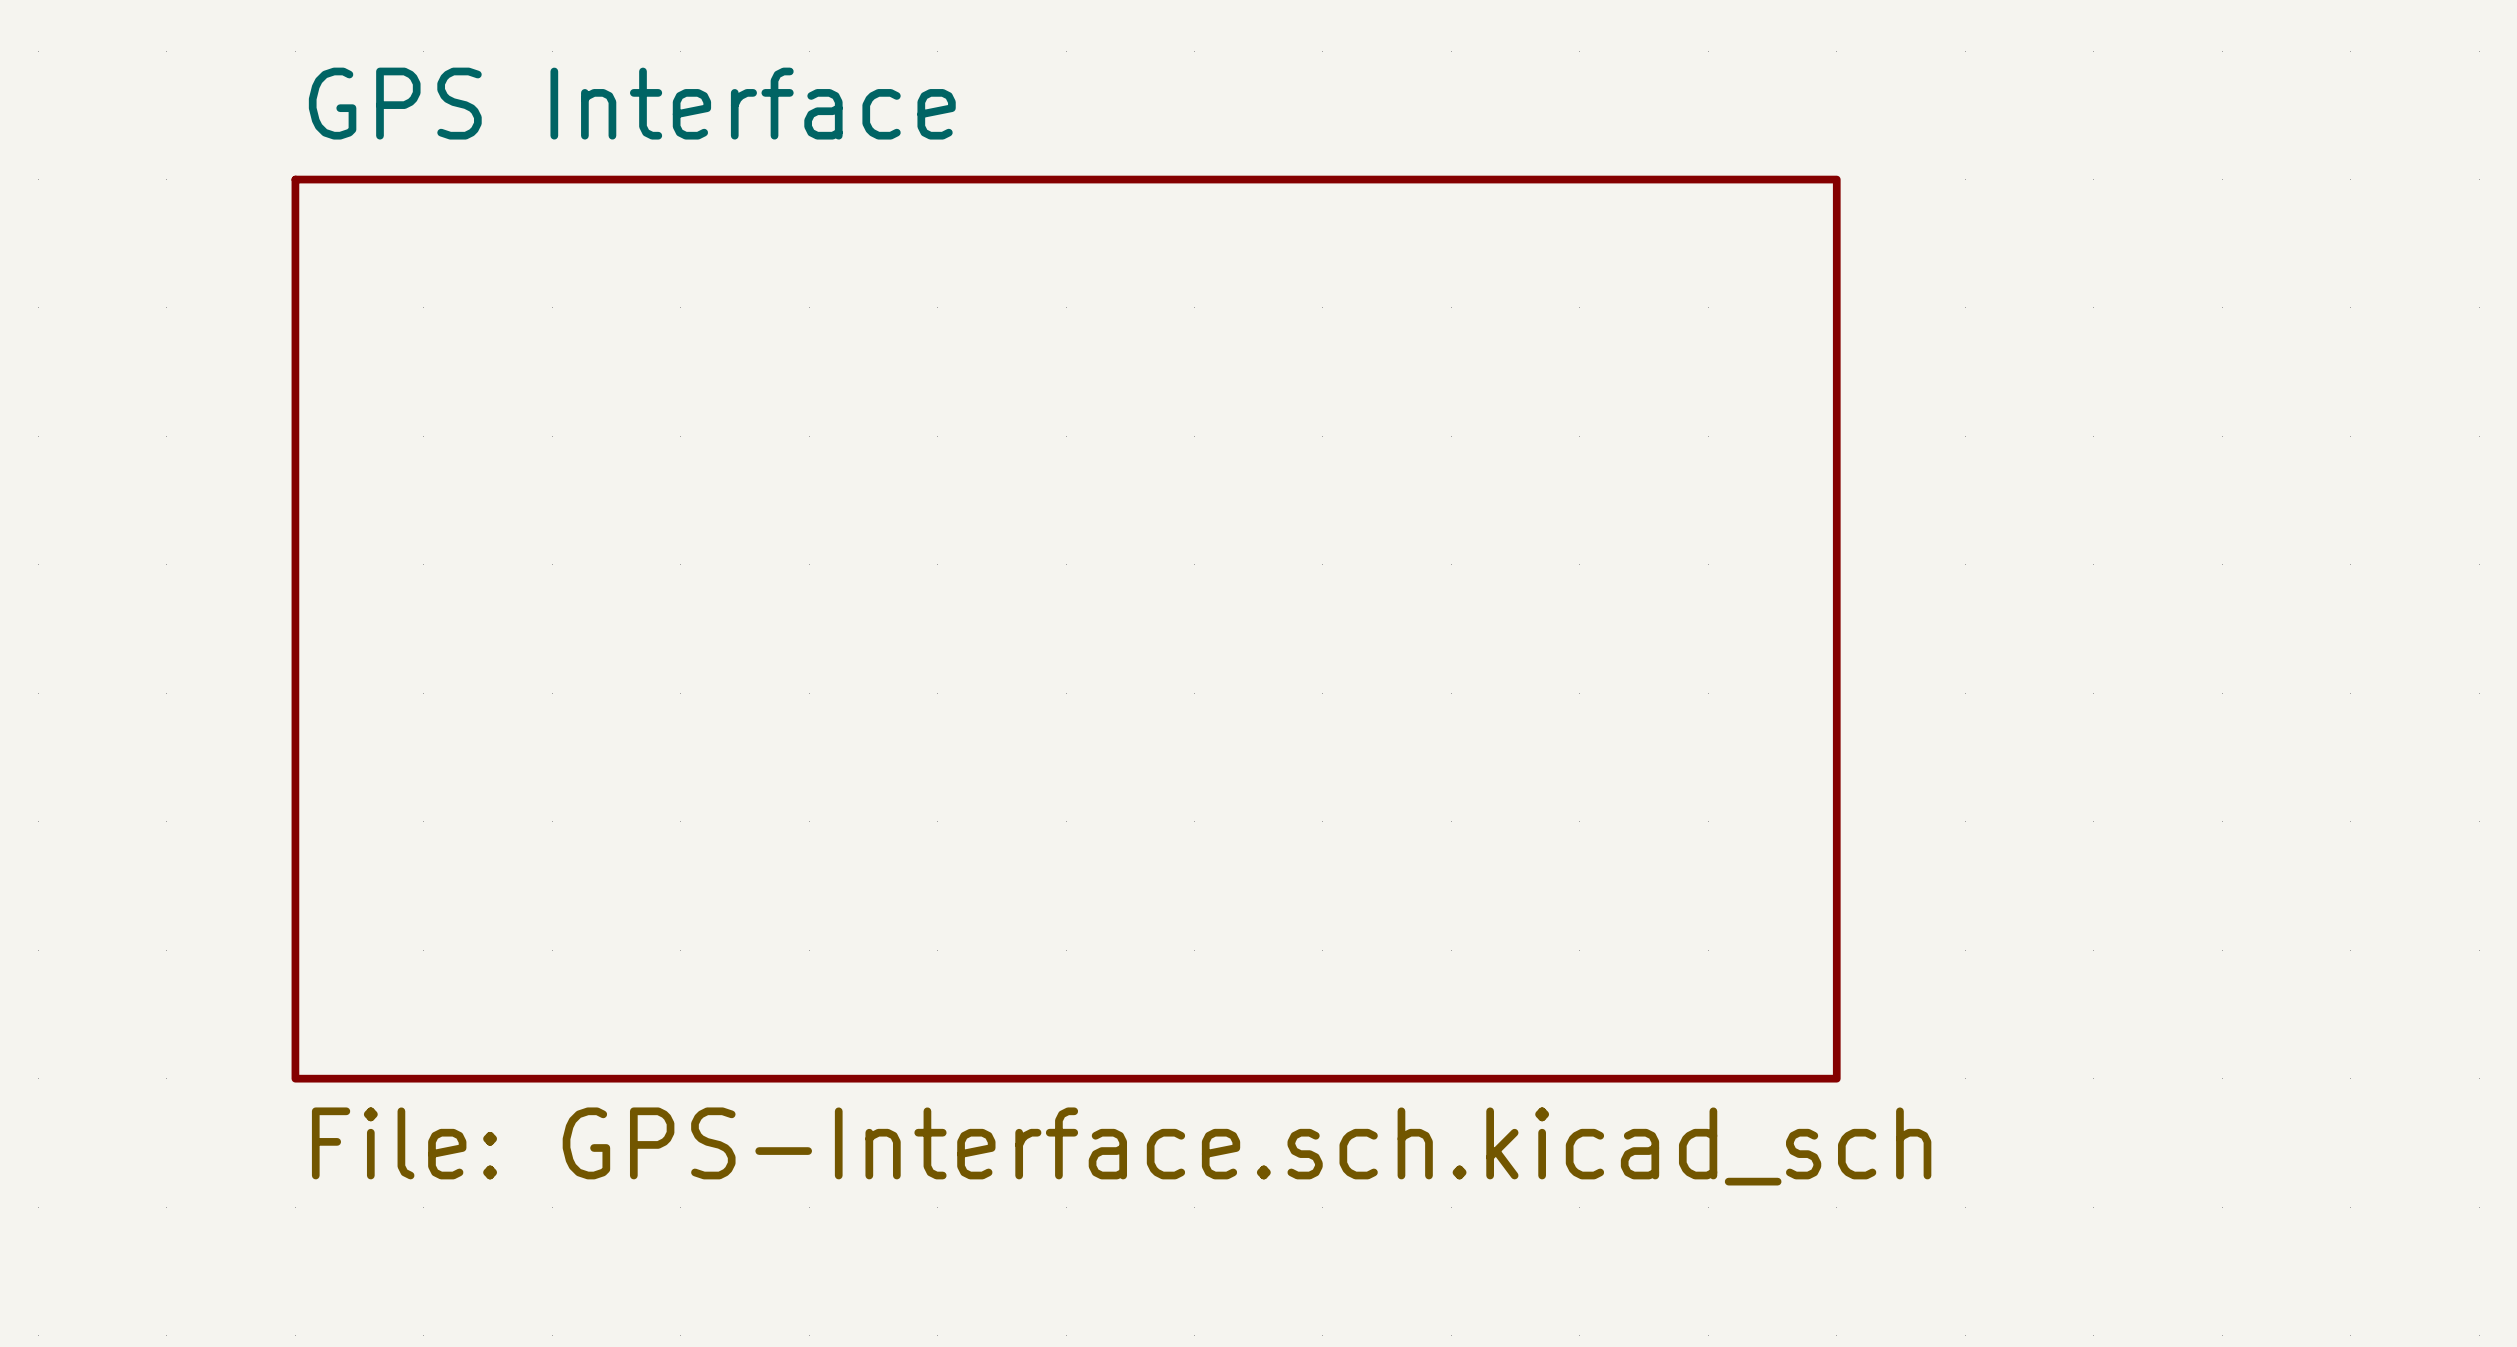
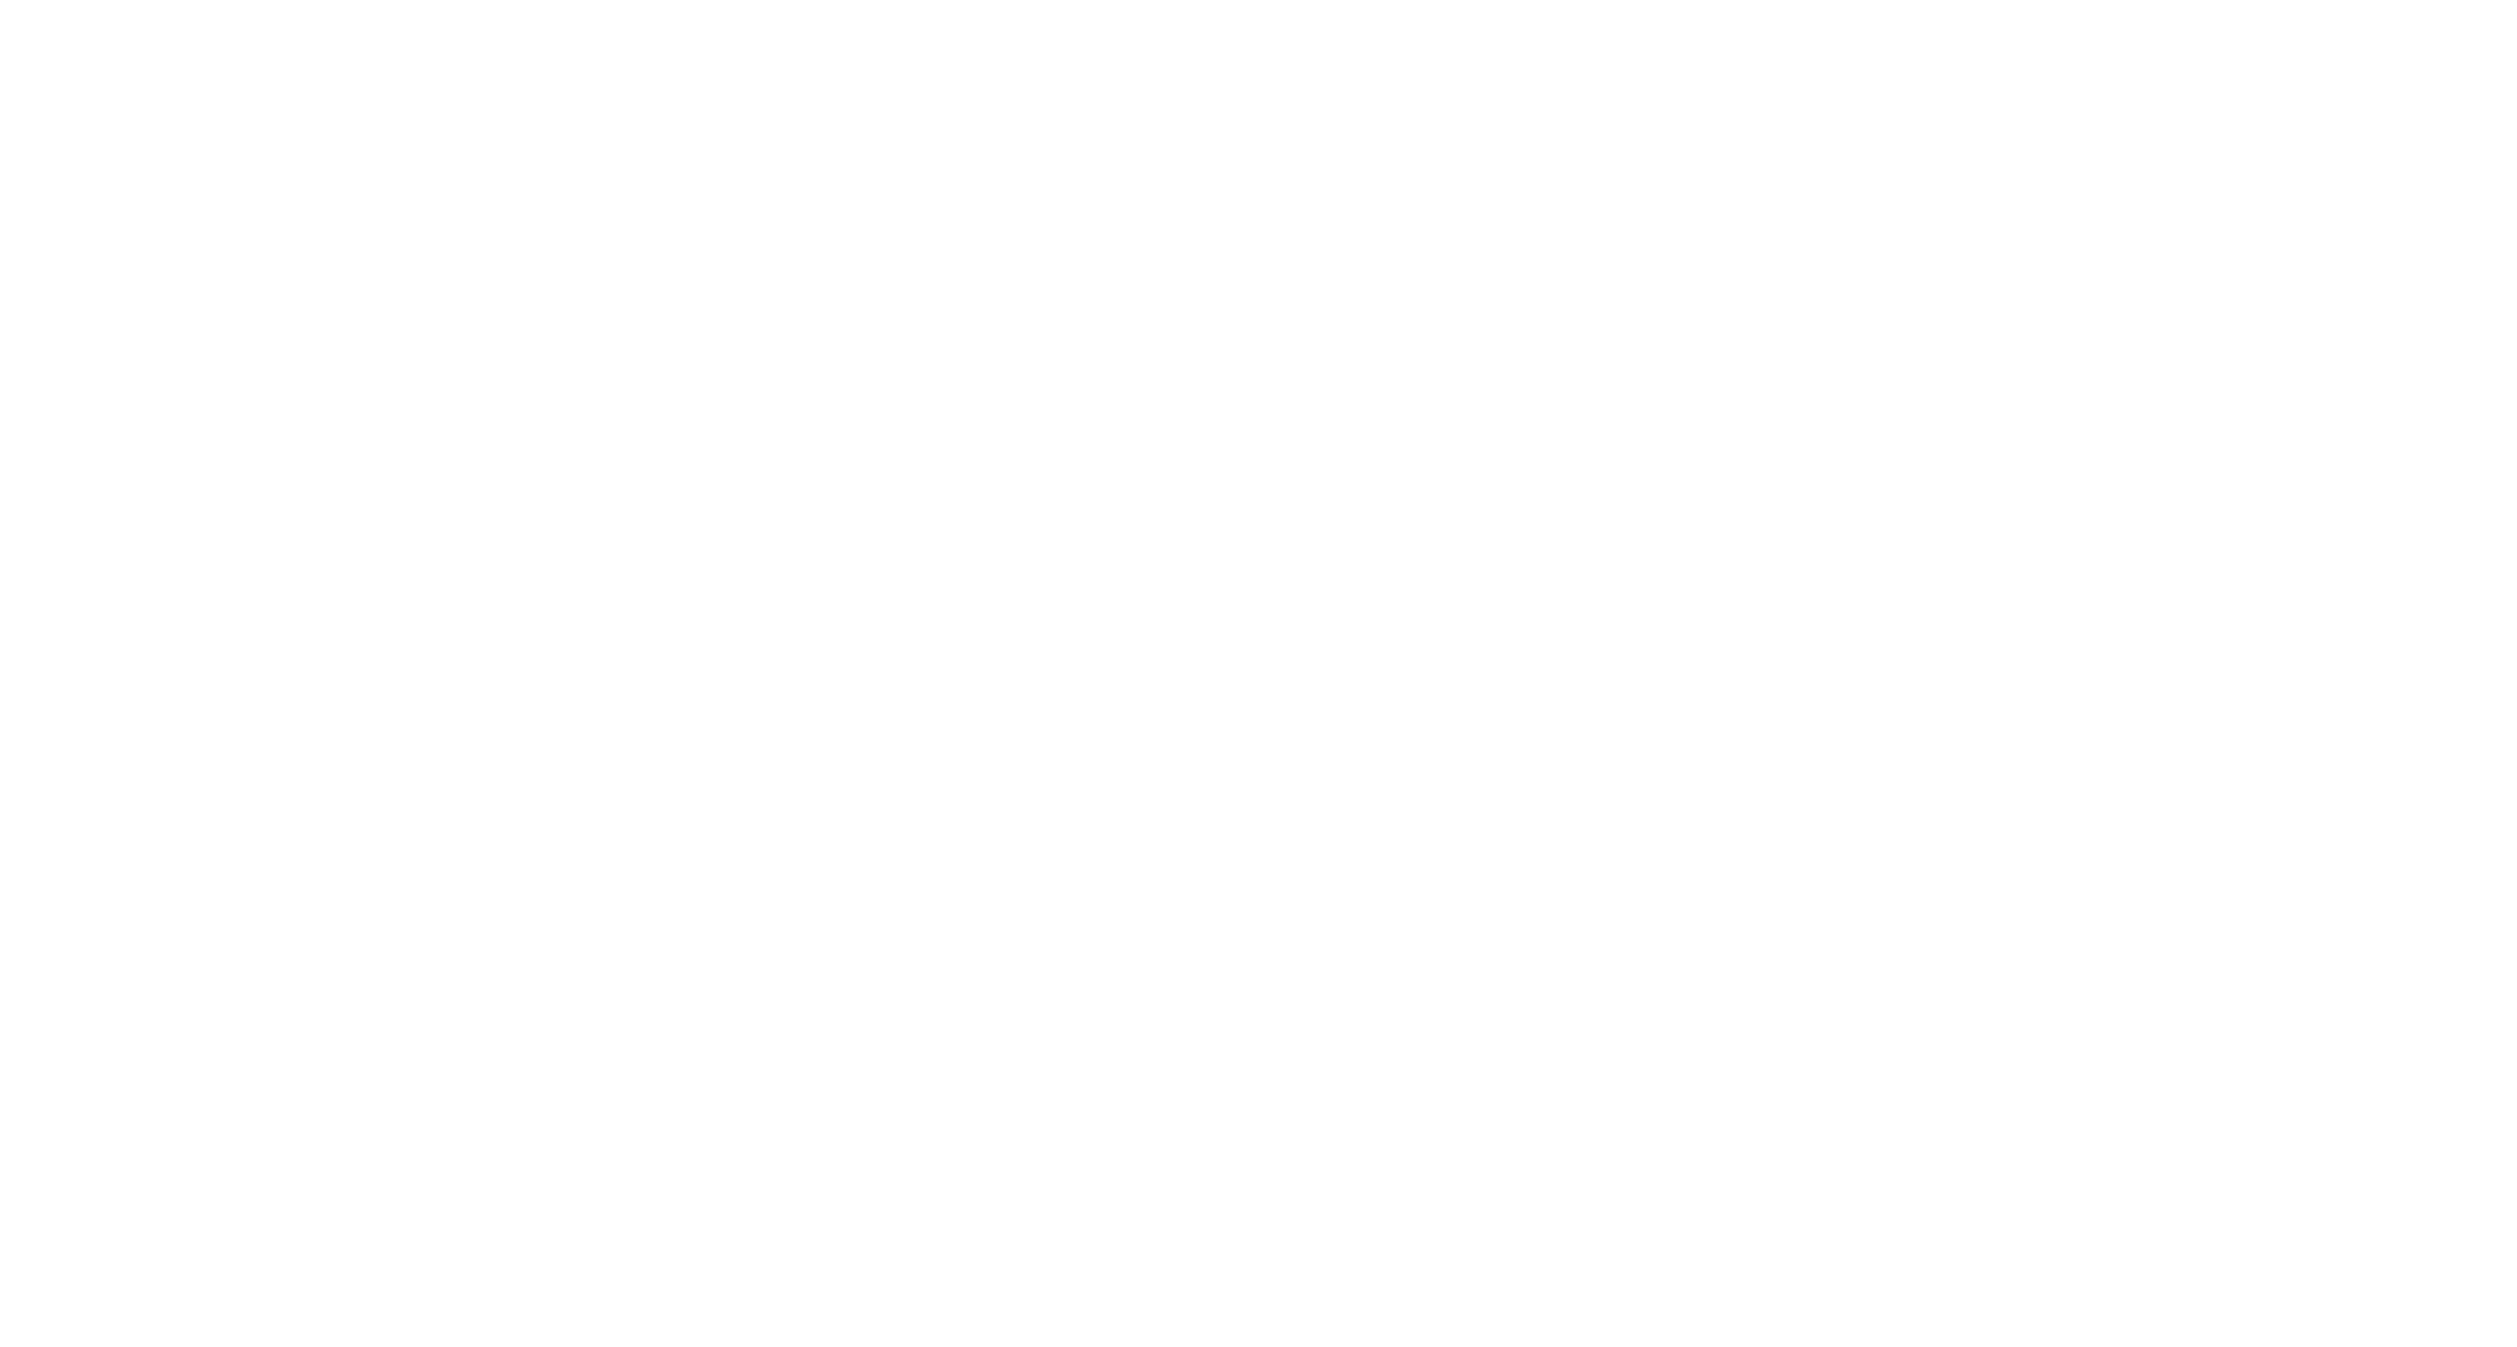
sheet GPS Interface: File: GPS-Interface.sch.kicad_sch (1066, 629) -> none

